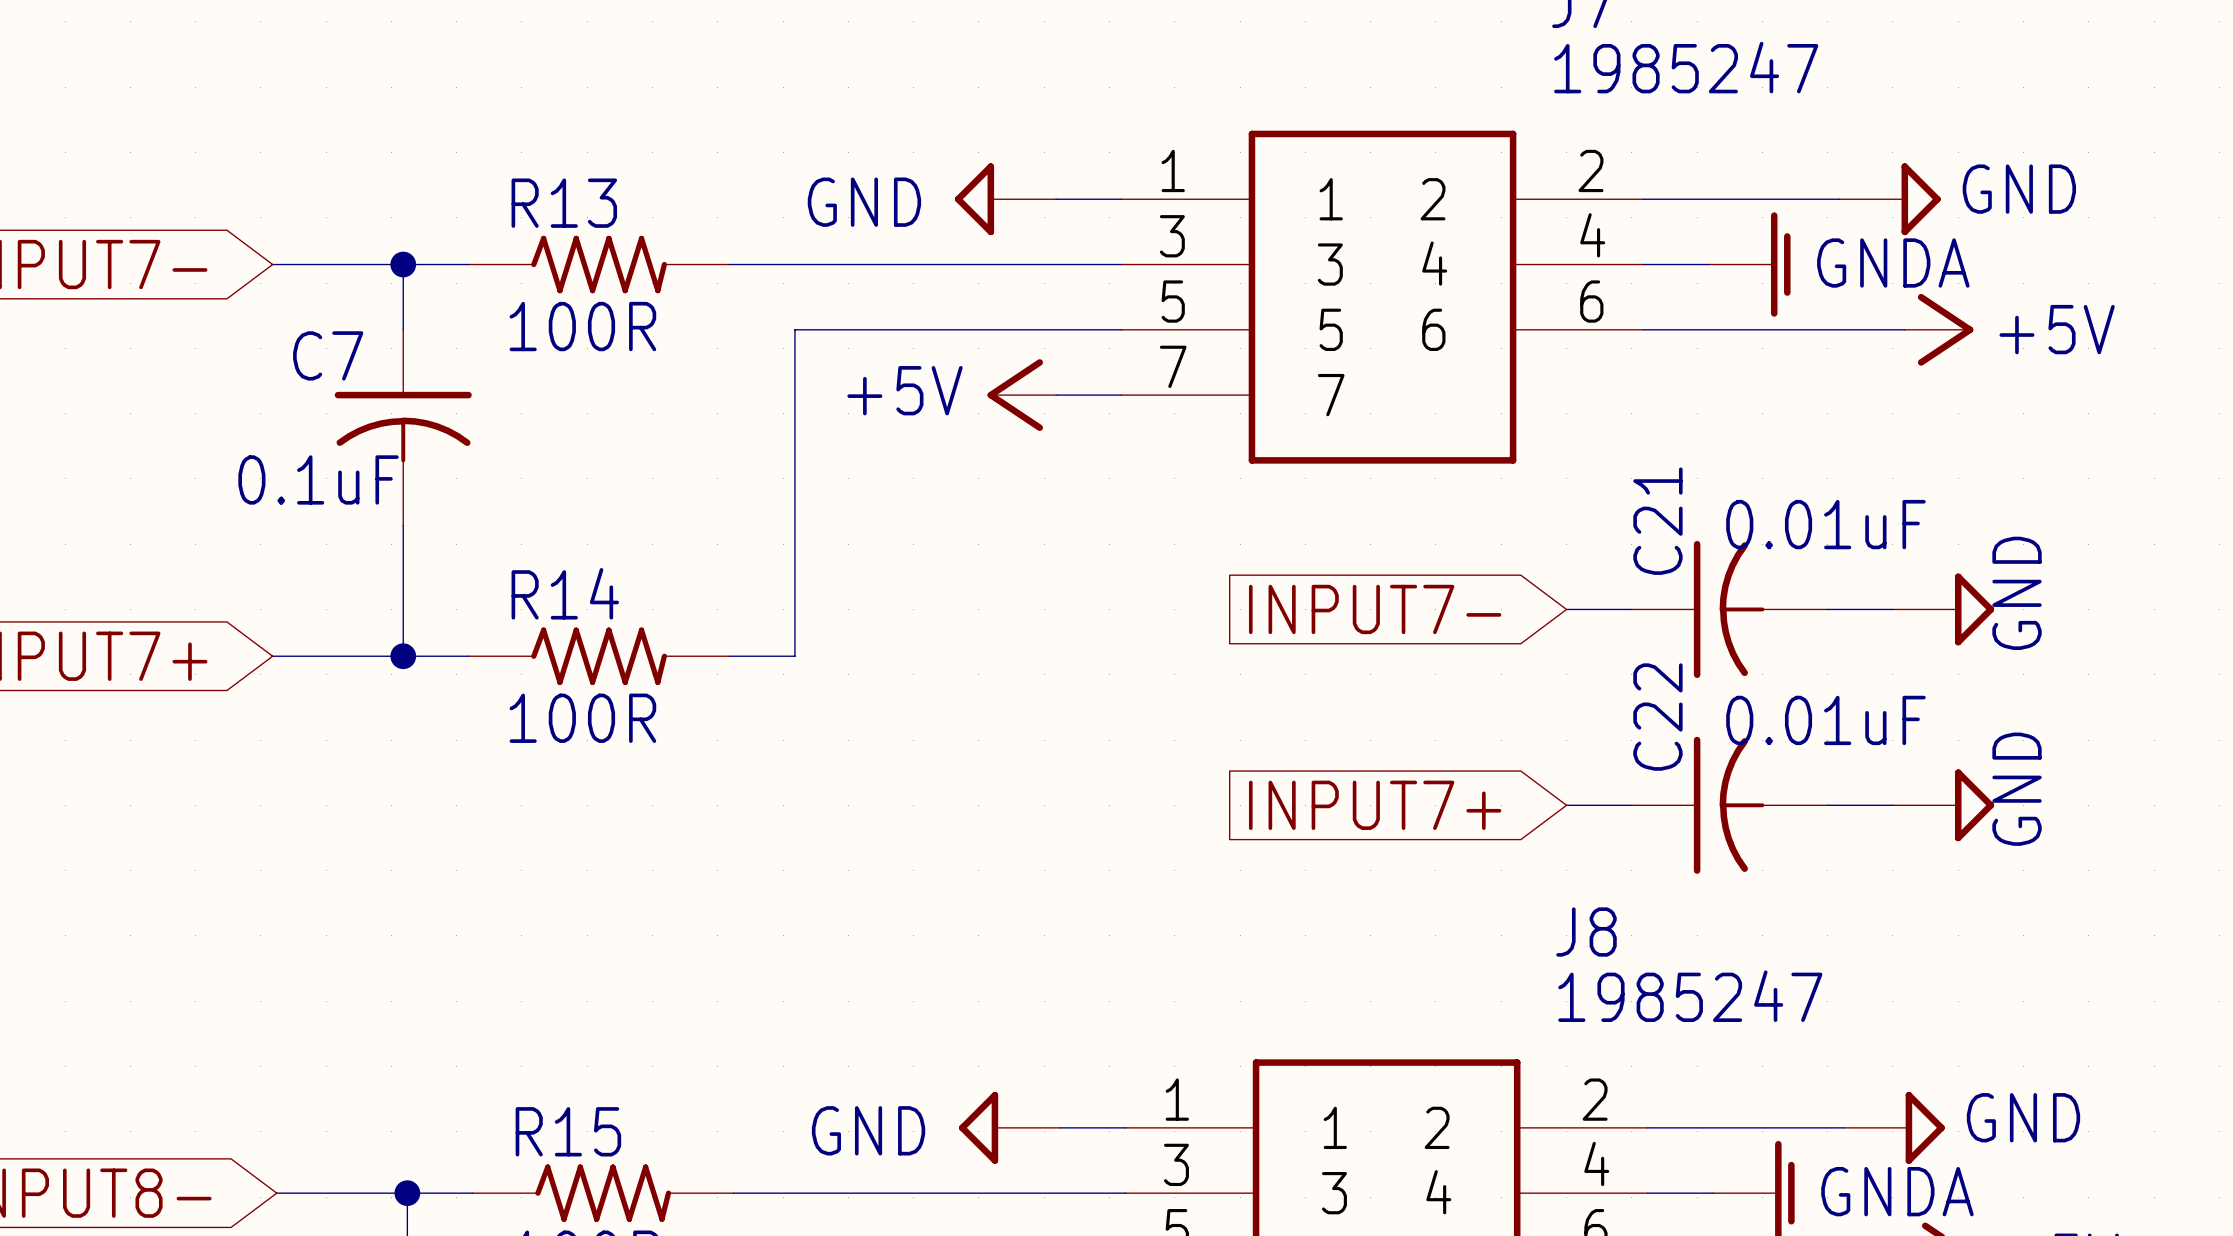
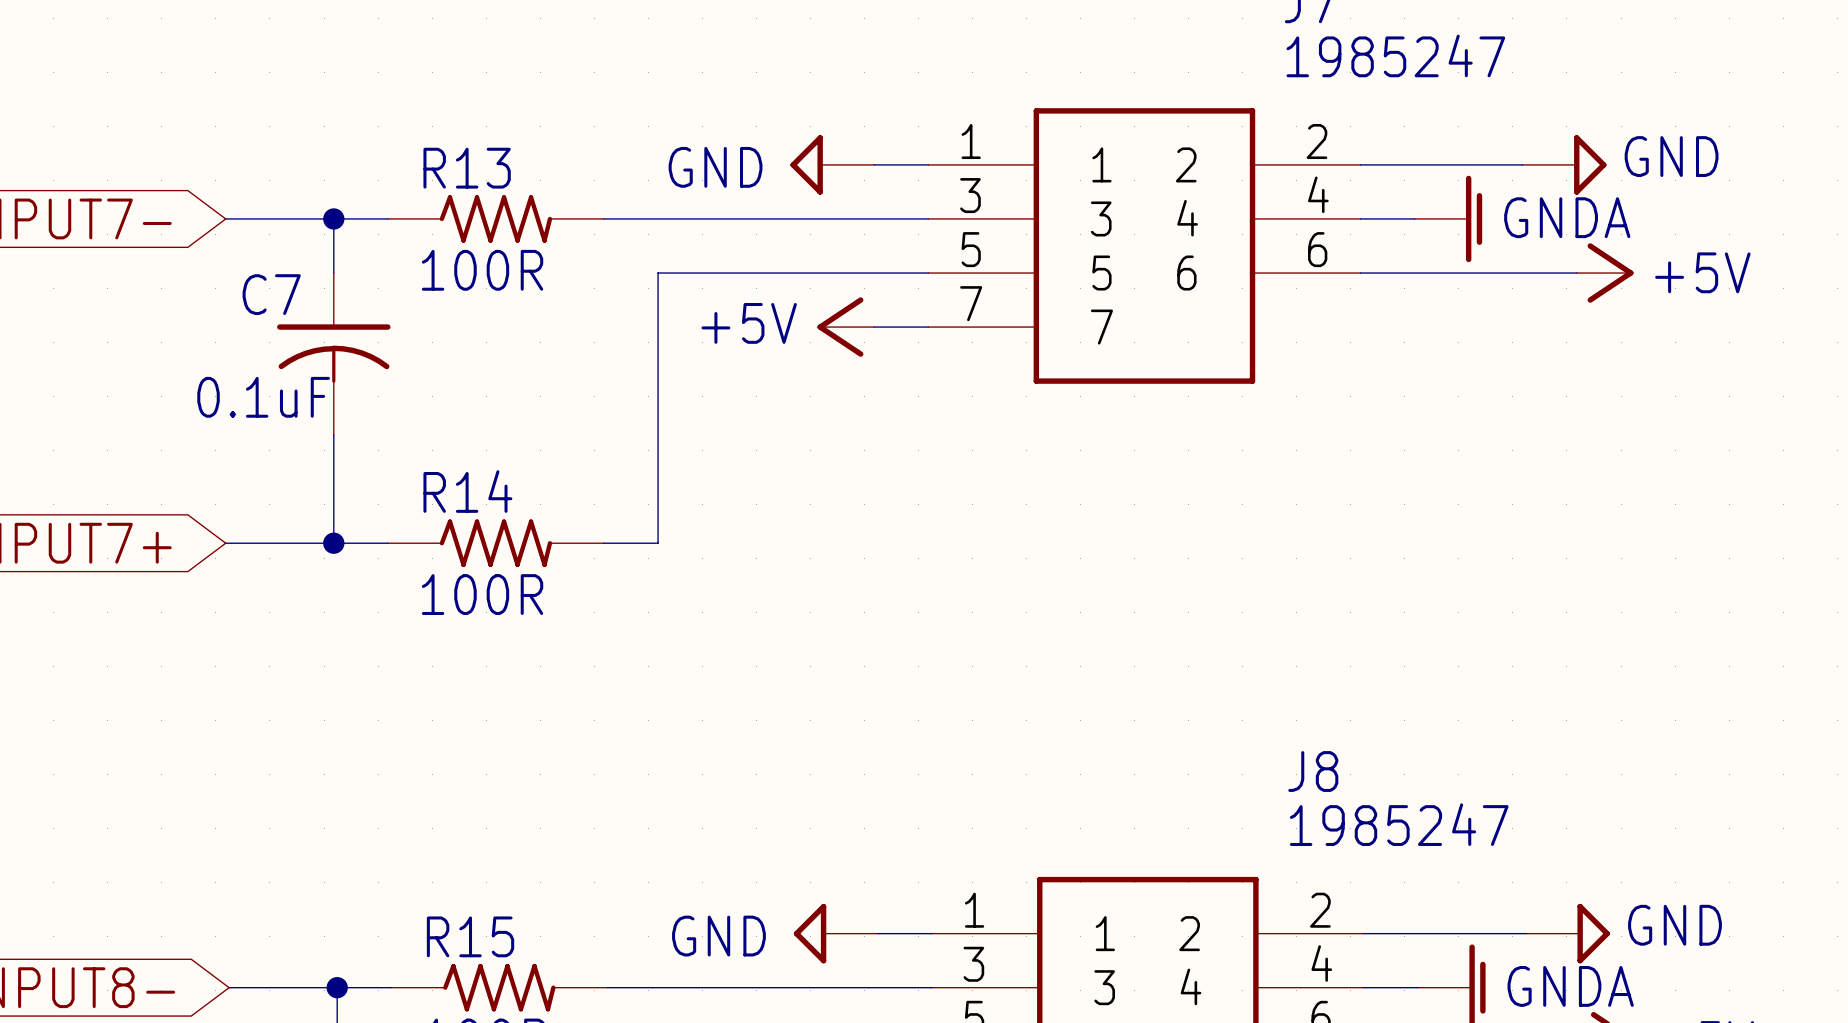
global label: INPUT7- (1375, 609) -> none
wire: (1566, 609) (1631, 609) -> none
C21: 0.01uF (1729, 609) -> none
wire: (1827, 609) (1892, 609) -> none
power symbol: GND (1943, 609) -> none
global label: INPUT7+ (1375, 805) -> none
wire: (1566, 805) (1631, 805) -> none
C22: 0.01uF (1729, 805) -> none
wire: (1827, 805) (1892, 805) -> none
power symbol: GND (1943, 805) -> none

